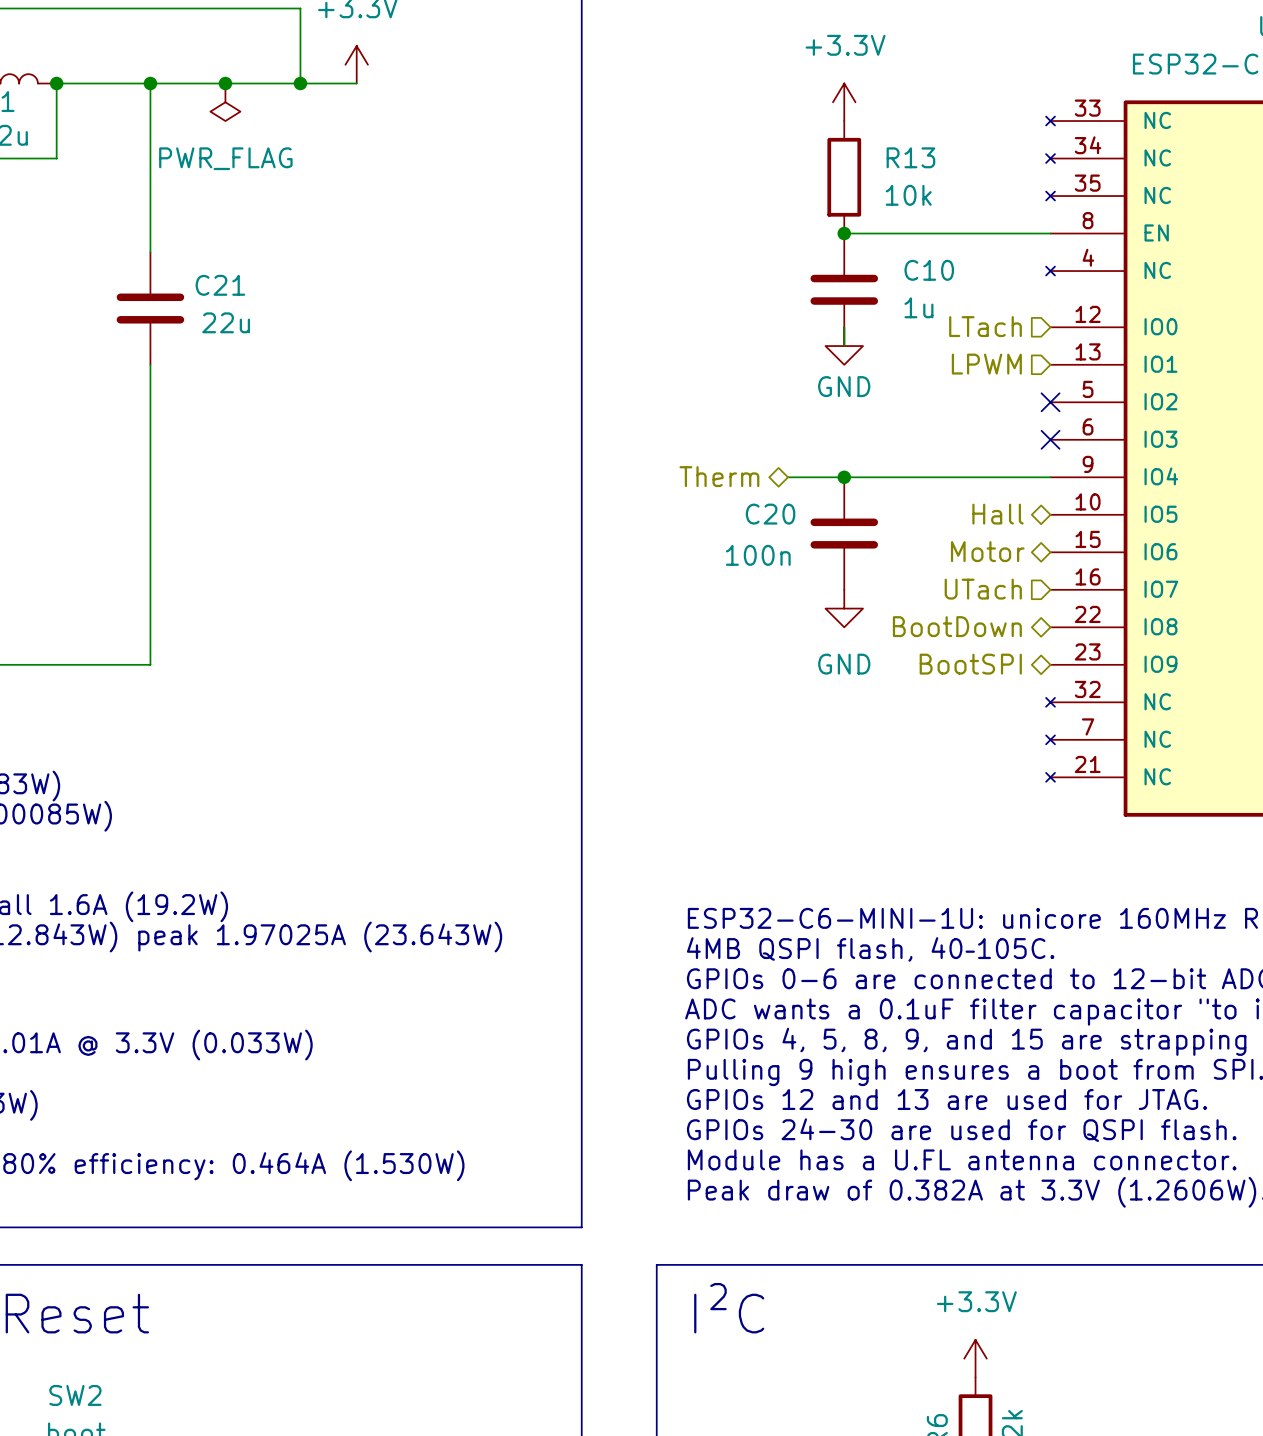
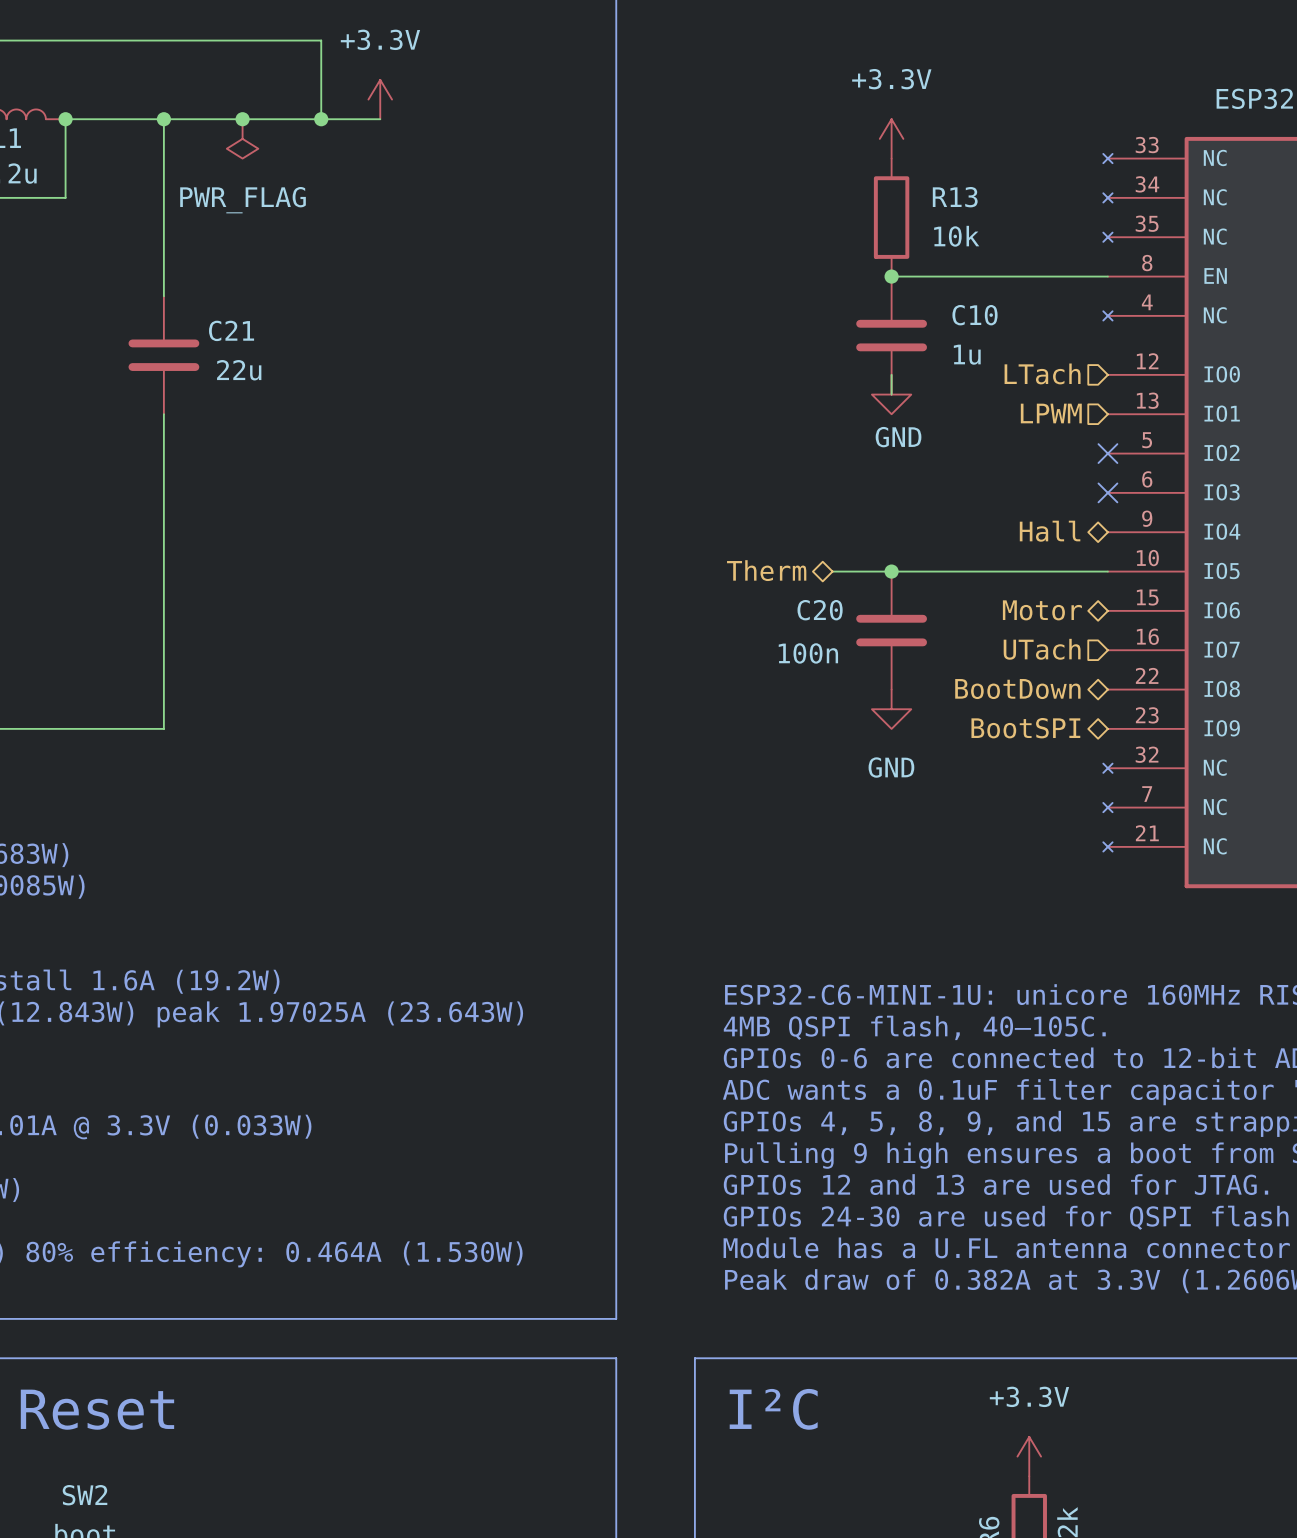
hierarchical label position: Therm (719, 476) -> Therm (766, 570)
wire: (788, 477) (1050, 477) -> (832, 571) (1107, 571)
junction position: (844, 477) -> (891, 571)
hierarchical label position: Hall (998, 514) -> Hall (1050, 531)
C20 position: (844, 533) -> (891, 630)
power symbol position: GND (844, 608) -> GND (891, 709)

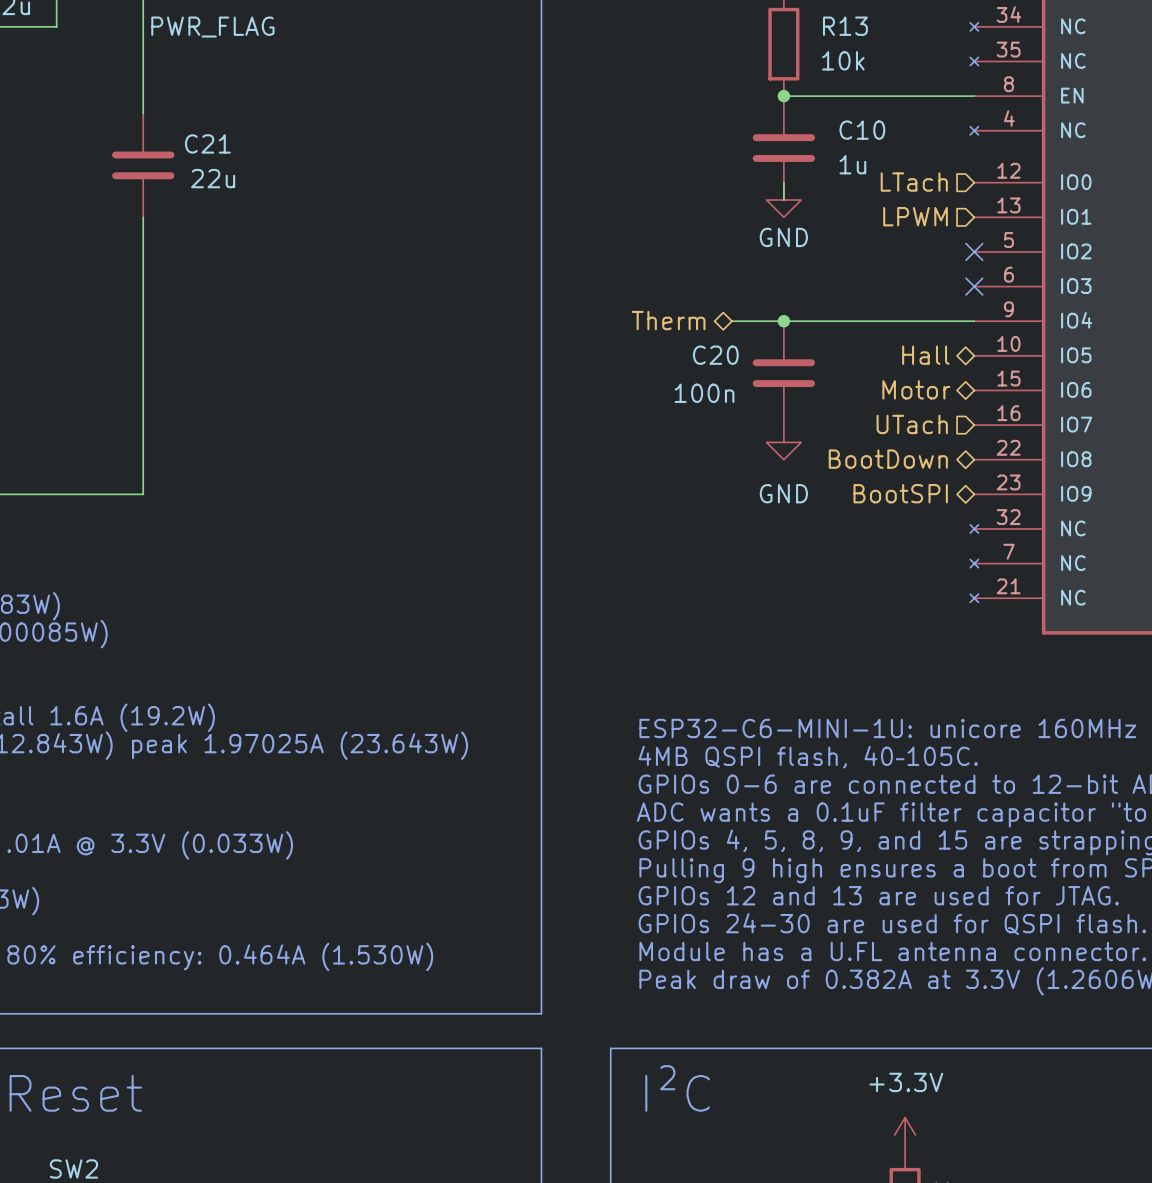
hierarchical label position: Hall (1050, 531) -> Hall (925, 355)
hierarchical label position: Therm (766, 570) -> Therm (668, 320)
wire: (832, 571) (1107, 571) -> (731, 321) (974, 321)
junction position: (891, 571) -> (783, 321)
C20 position: (891, 630) -> (783, 373)
power symbol position: GND (891, 709) -> GND (783, 442)

